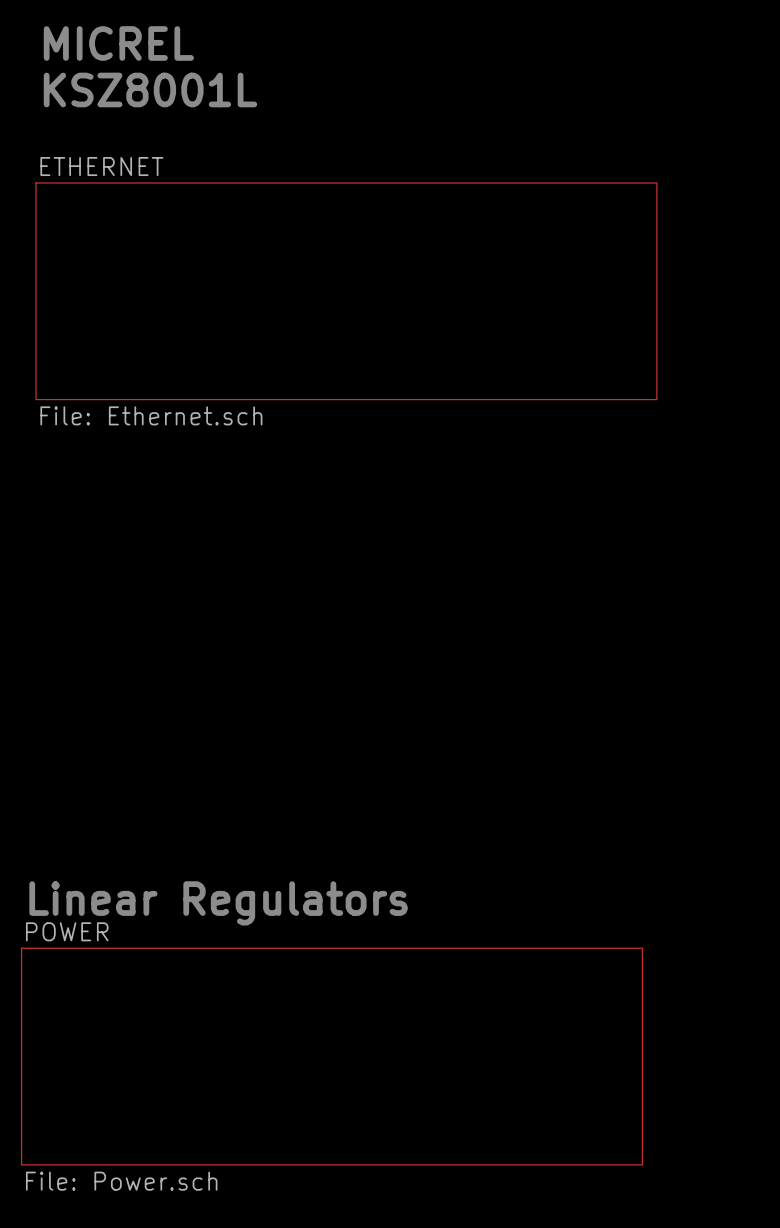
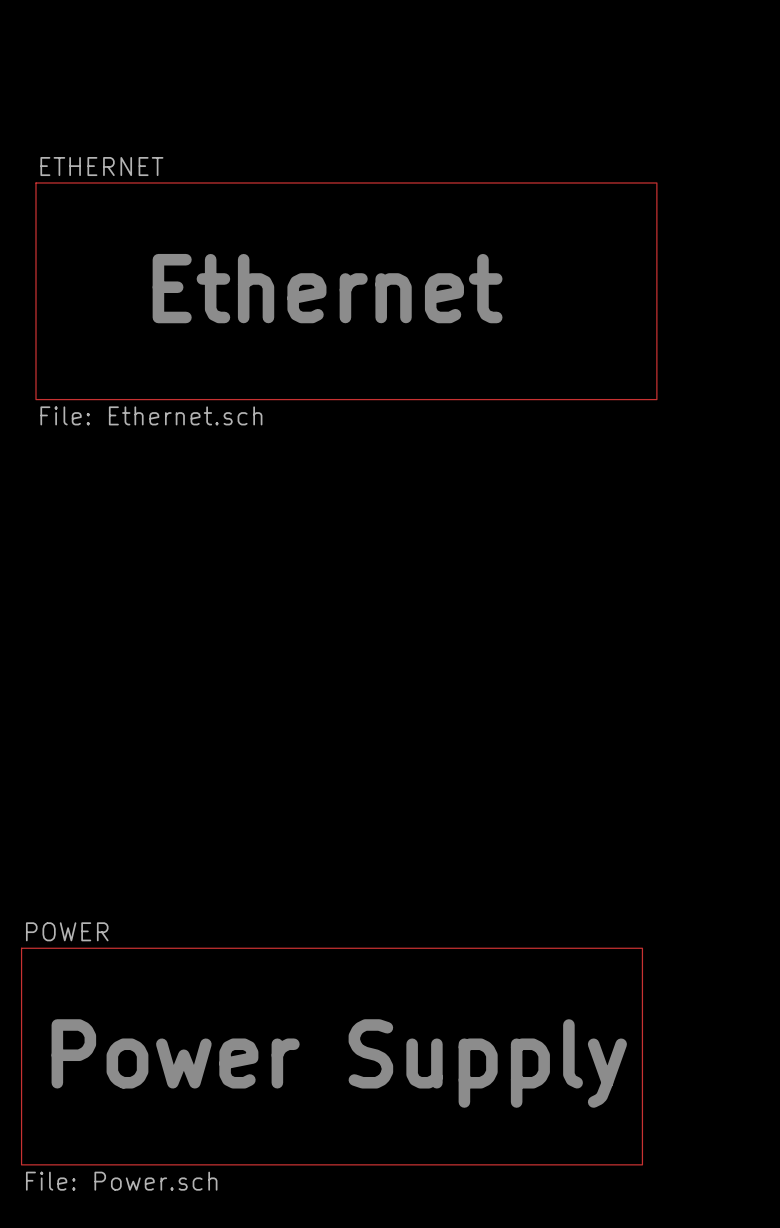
text: MICREL (118, 43) -> none
text: KSZ8001L (150, 89) -> none
text: none -> Ethernet (327, 288)
text: Linear Regulators (218, 903) -> none
text: none -> Power Supply (339, 1063)

